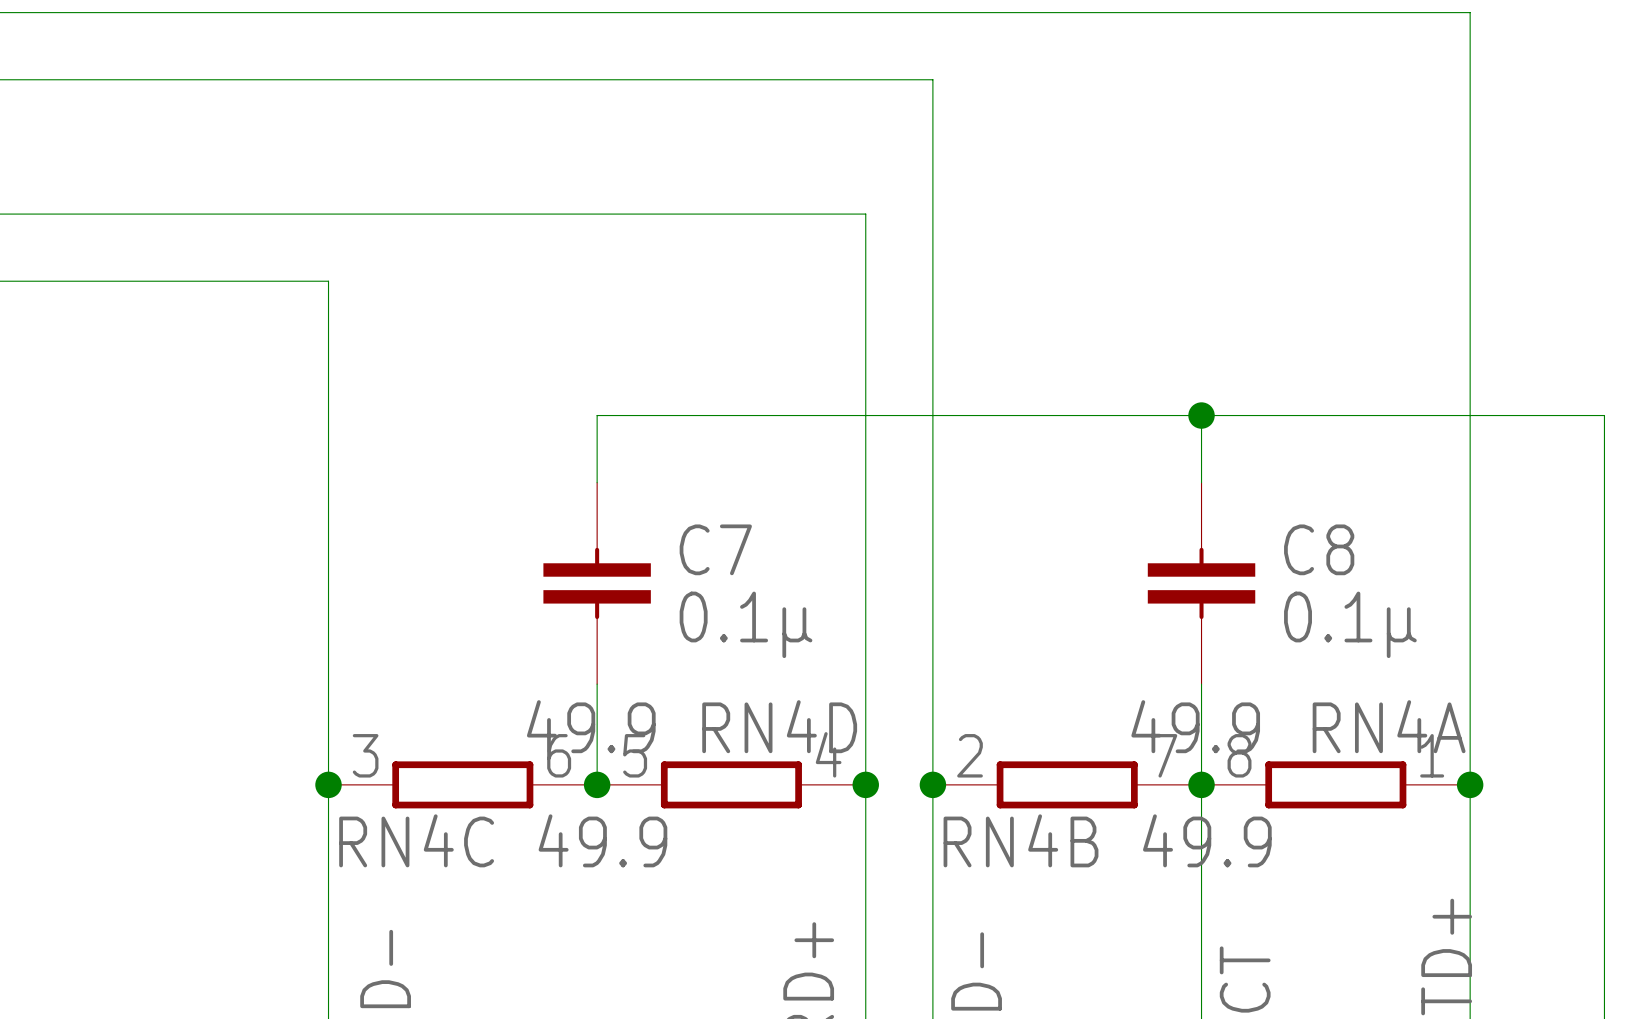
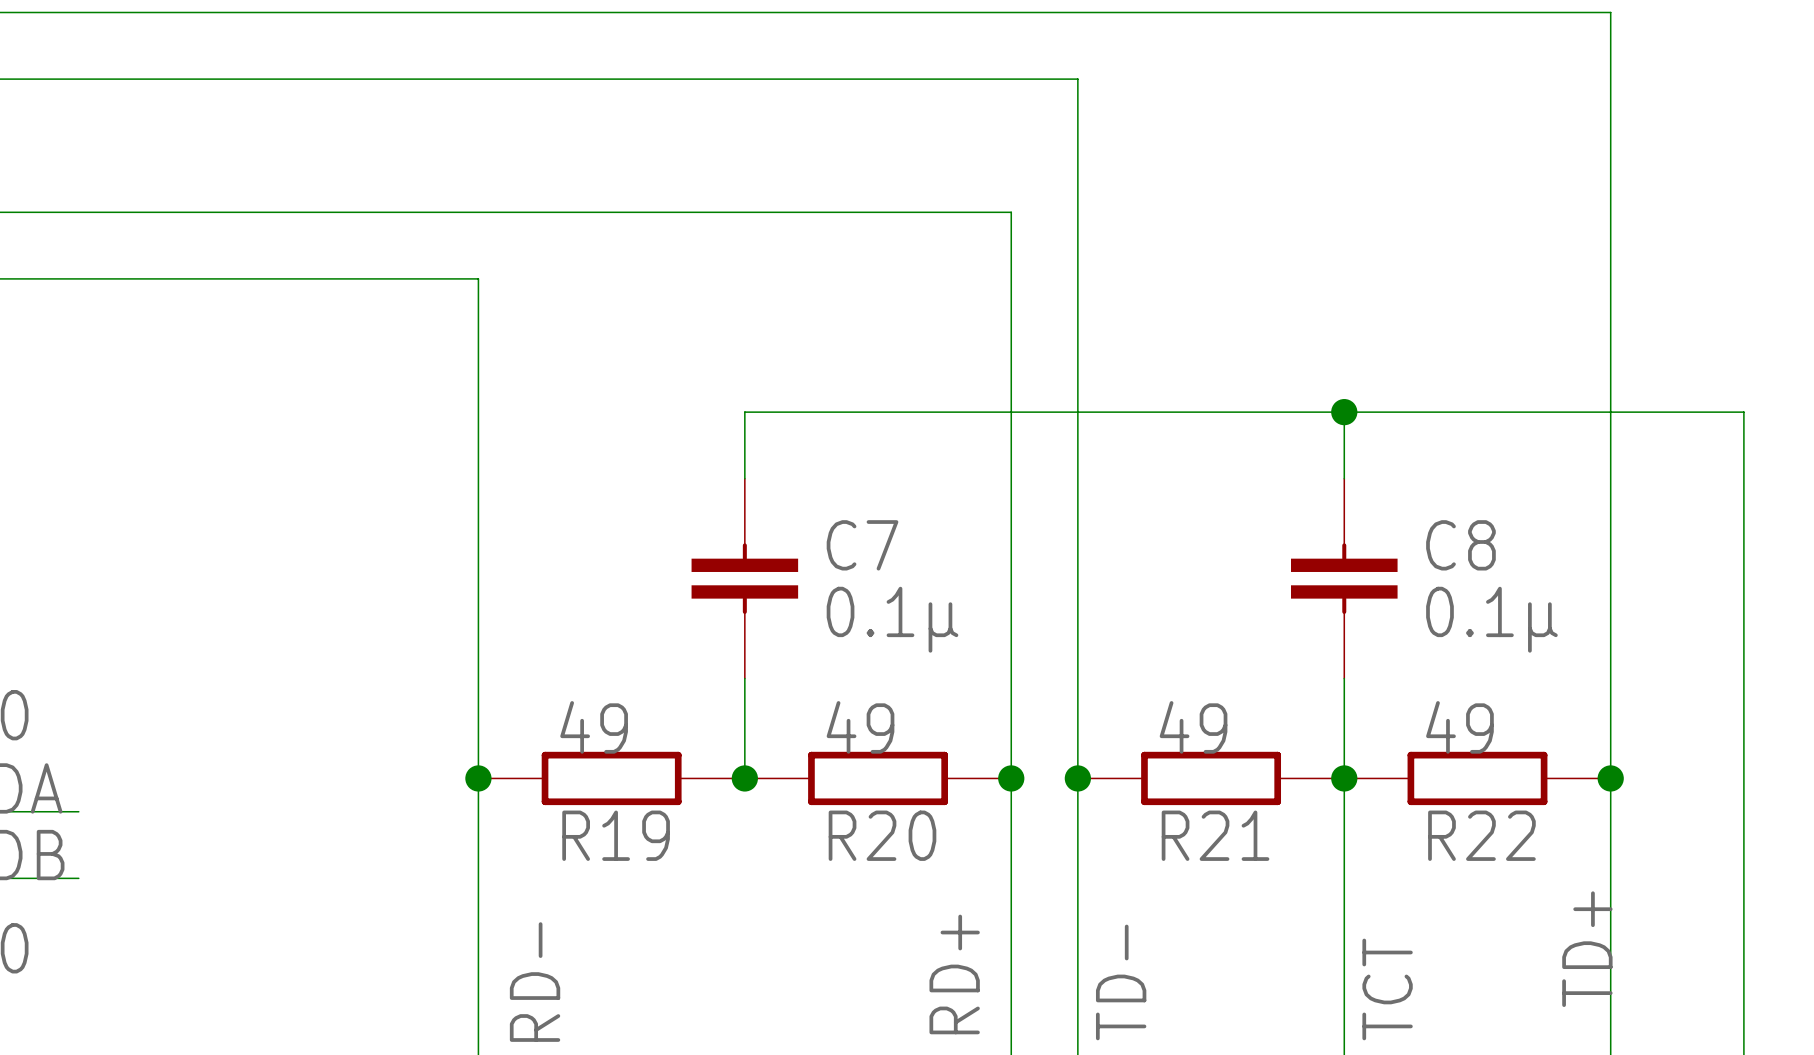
RN4C: 49.9 (462, 784) -> none
R19: none -> 49 (611, 778)
RN4D: 49.9 (731, 784) -> none
R20: none -> 49 (878, 778)
RN4B: 49.9 (1067, 784) -> none
R21: none -> 49 (1211, 778)
RN4A: 49.9 (1335, 784) -> none
R22: none -> 49 (1477, 778)

